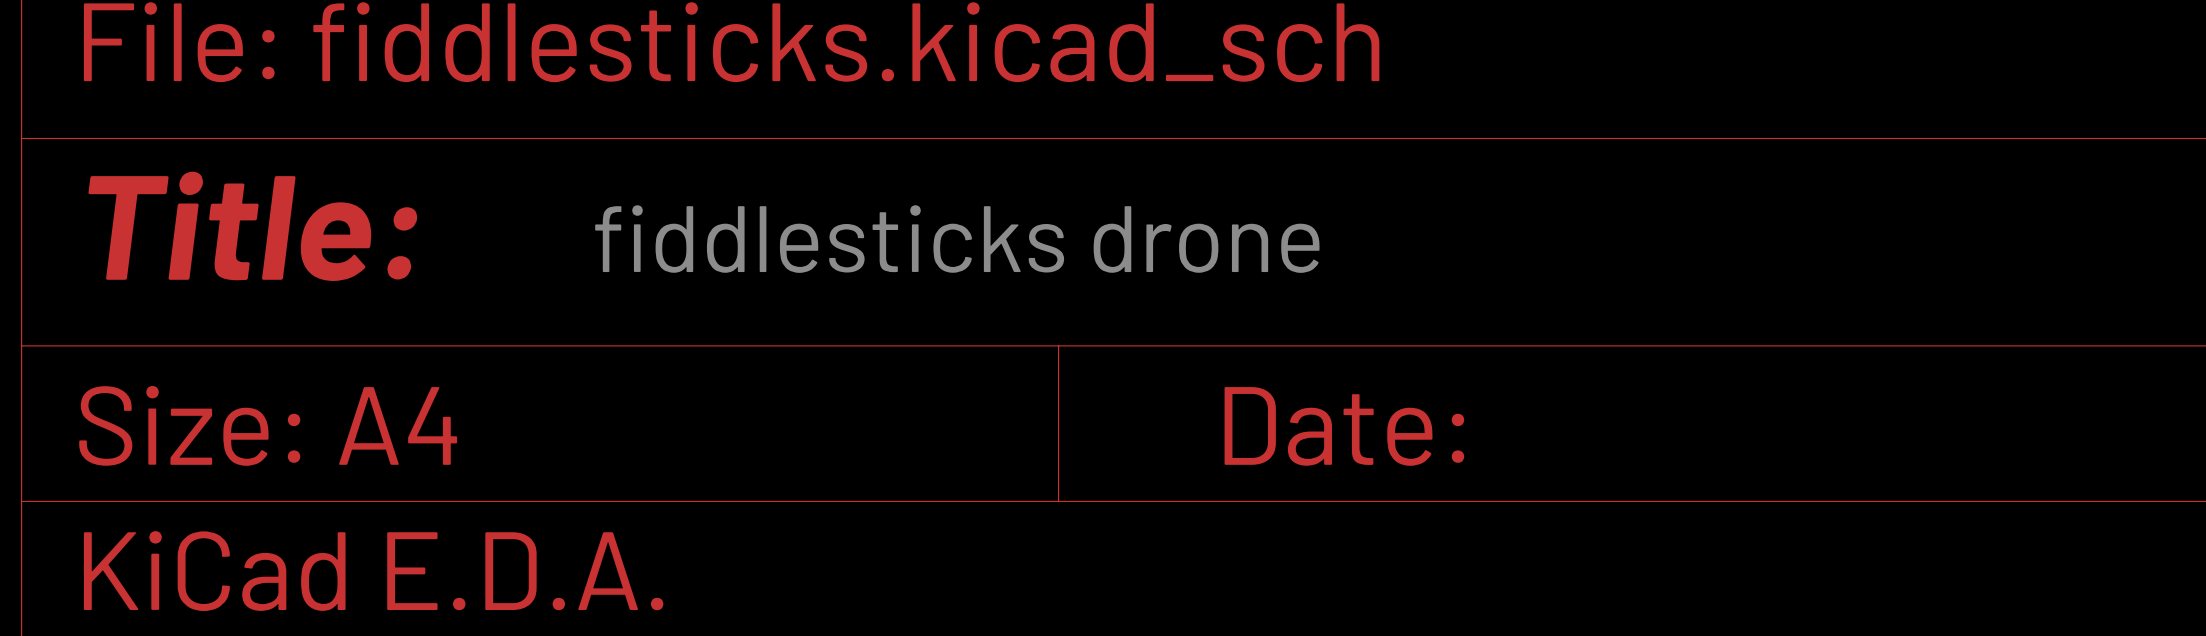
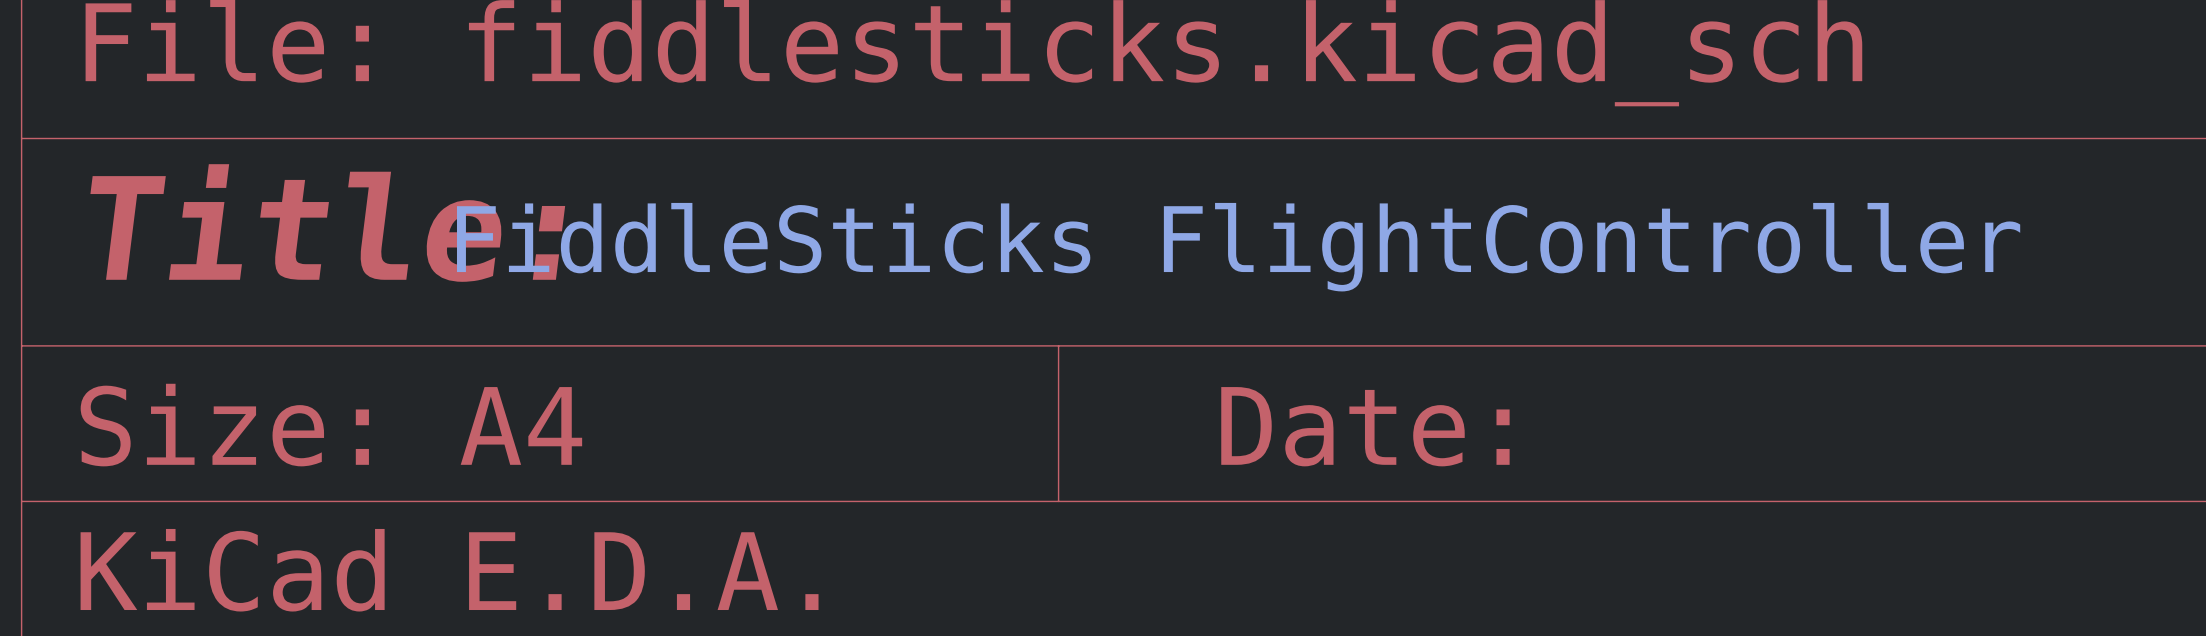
text: fiddlesticks drone (957, 239) -> none
text: none -> FiddleSticks FlightController (1238, 247)

